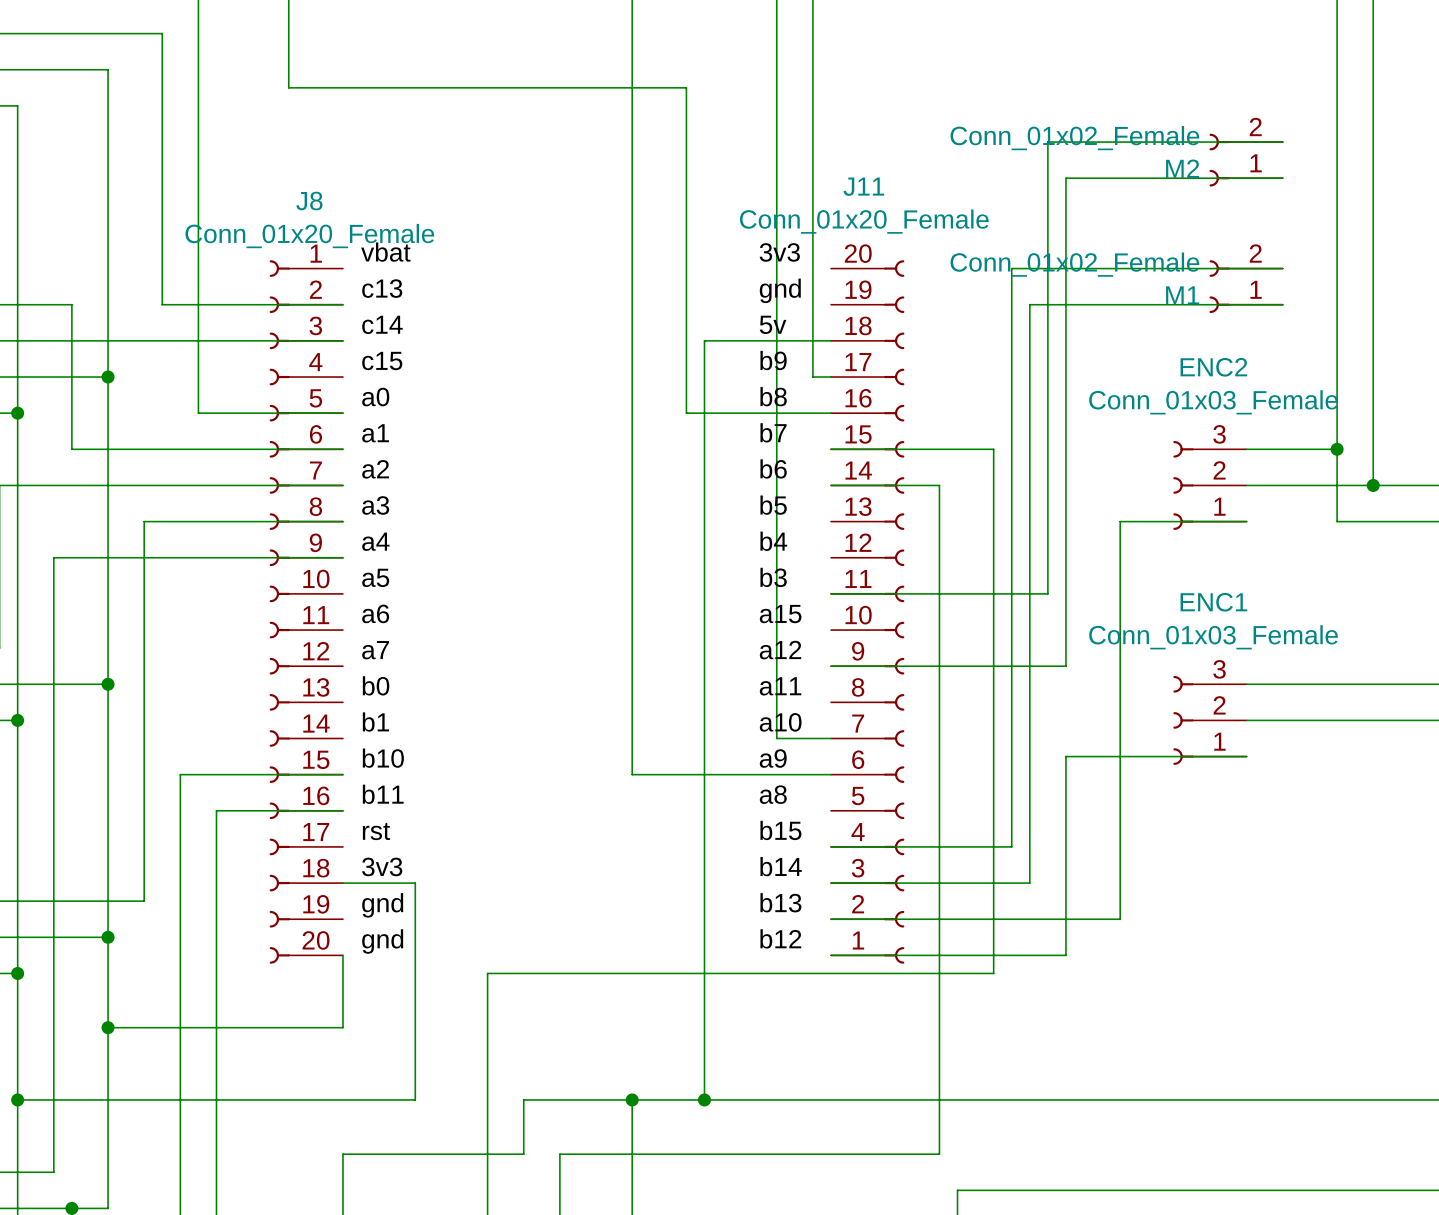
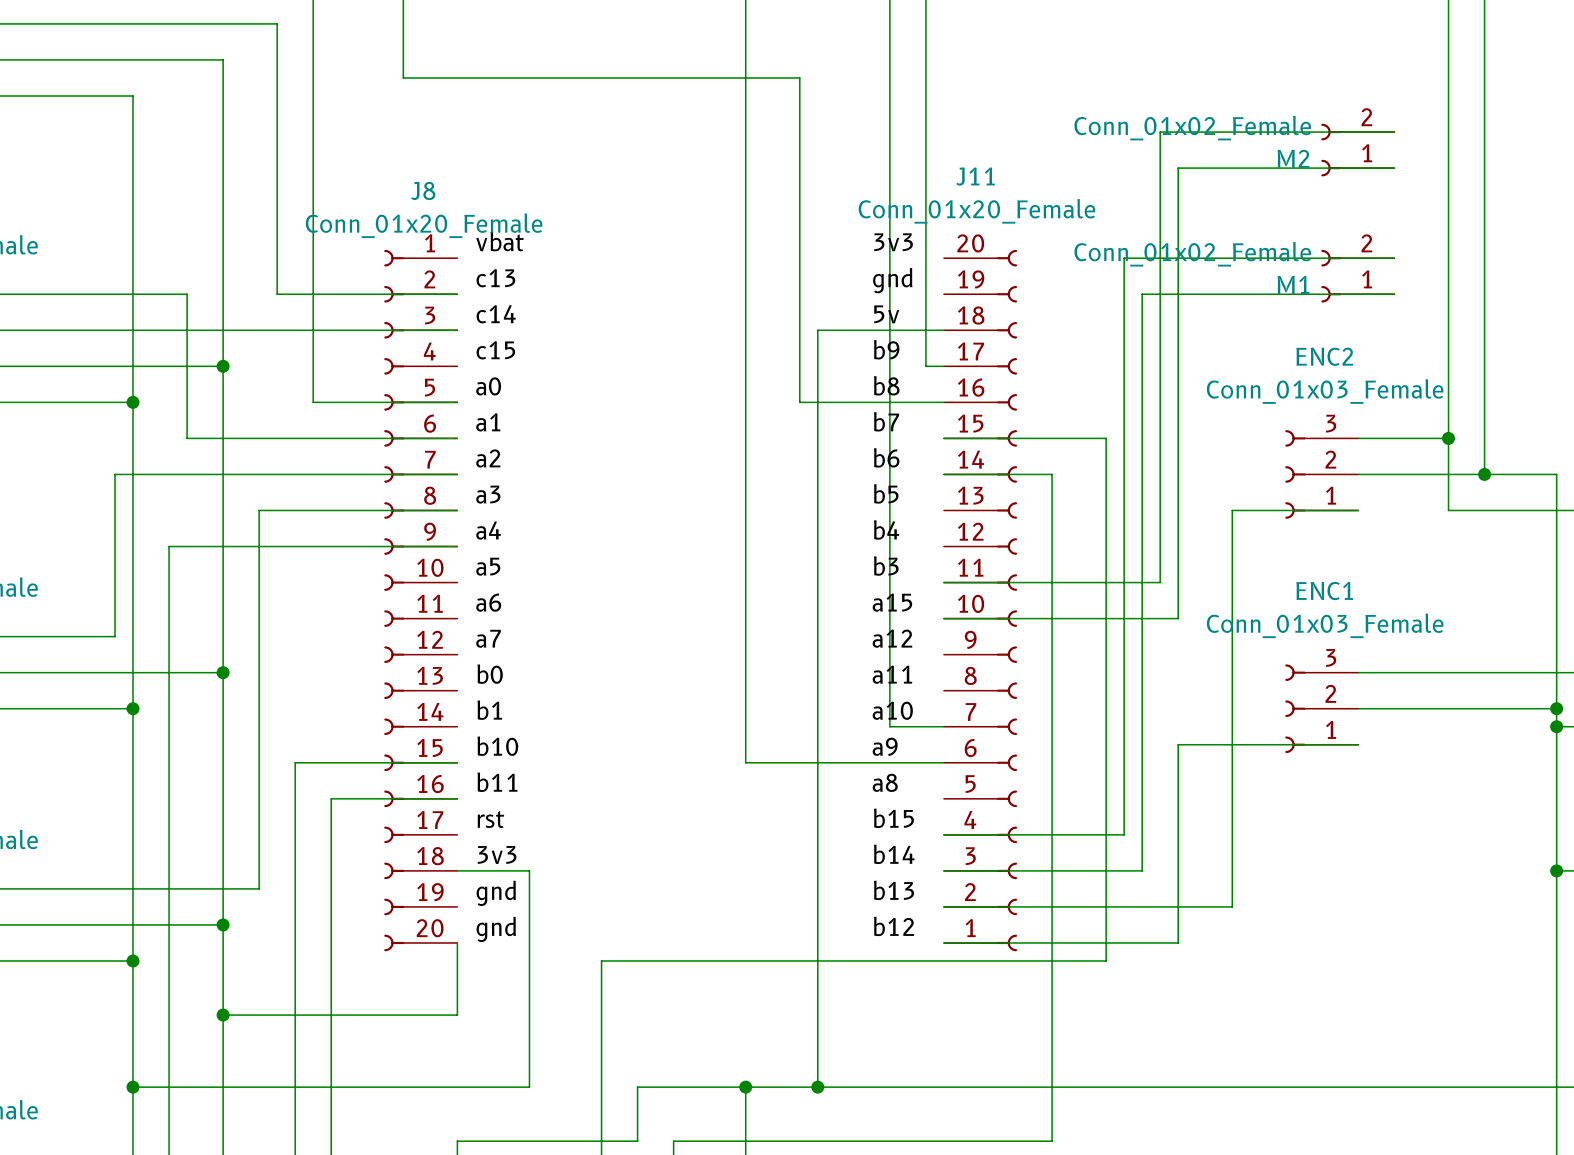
wire: (1065, 630) (1065, 666) (831, 666) -> (1178, 618) (943, 618)

